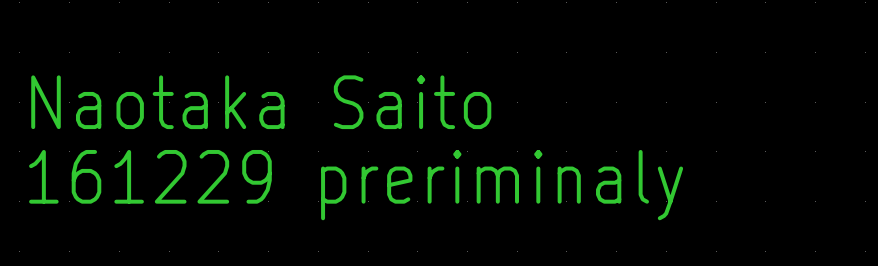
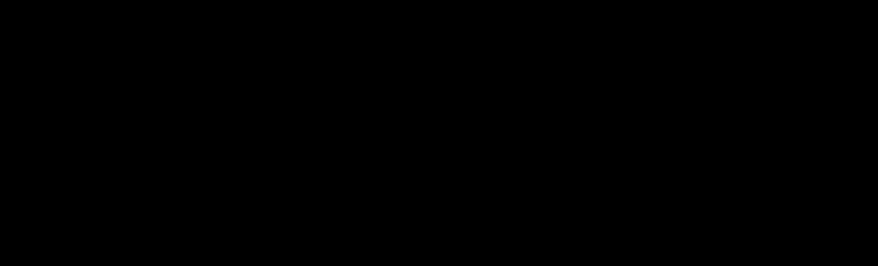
text: Naotaka Saito (261, 102) -> none
text: 161229 preriminaly (356, 185) -> none

